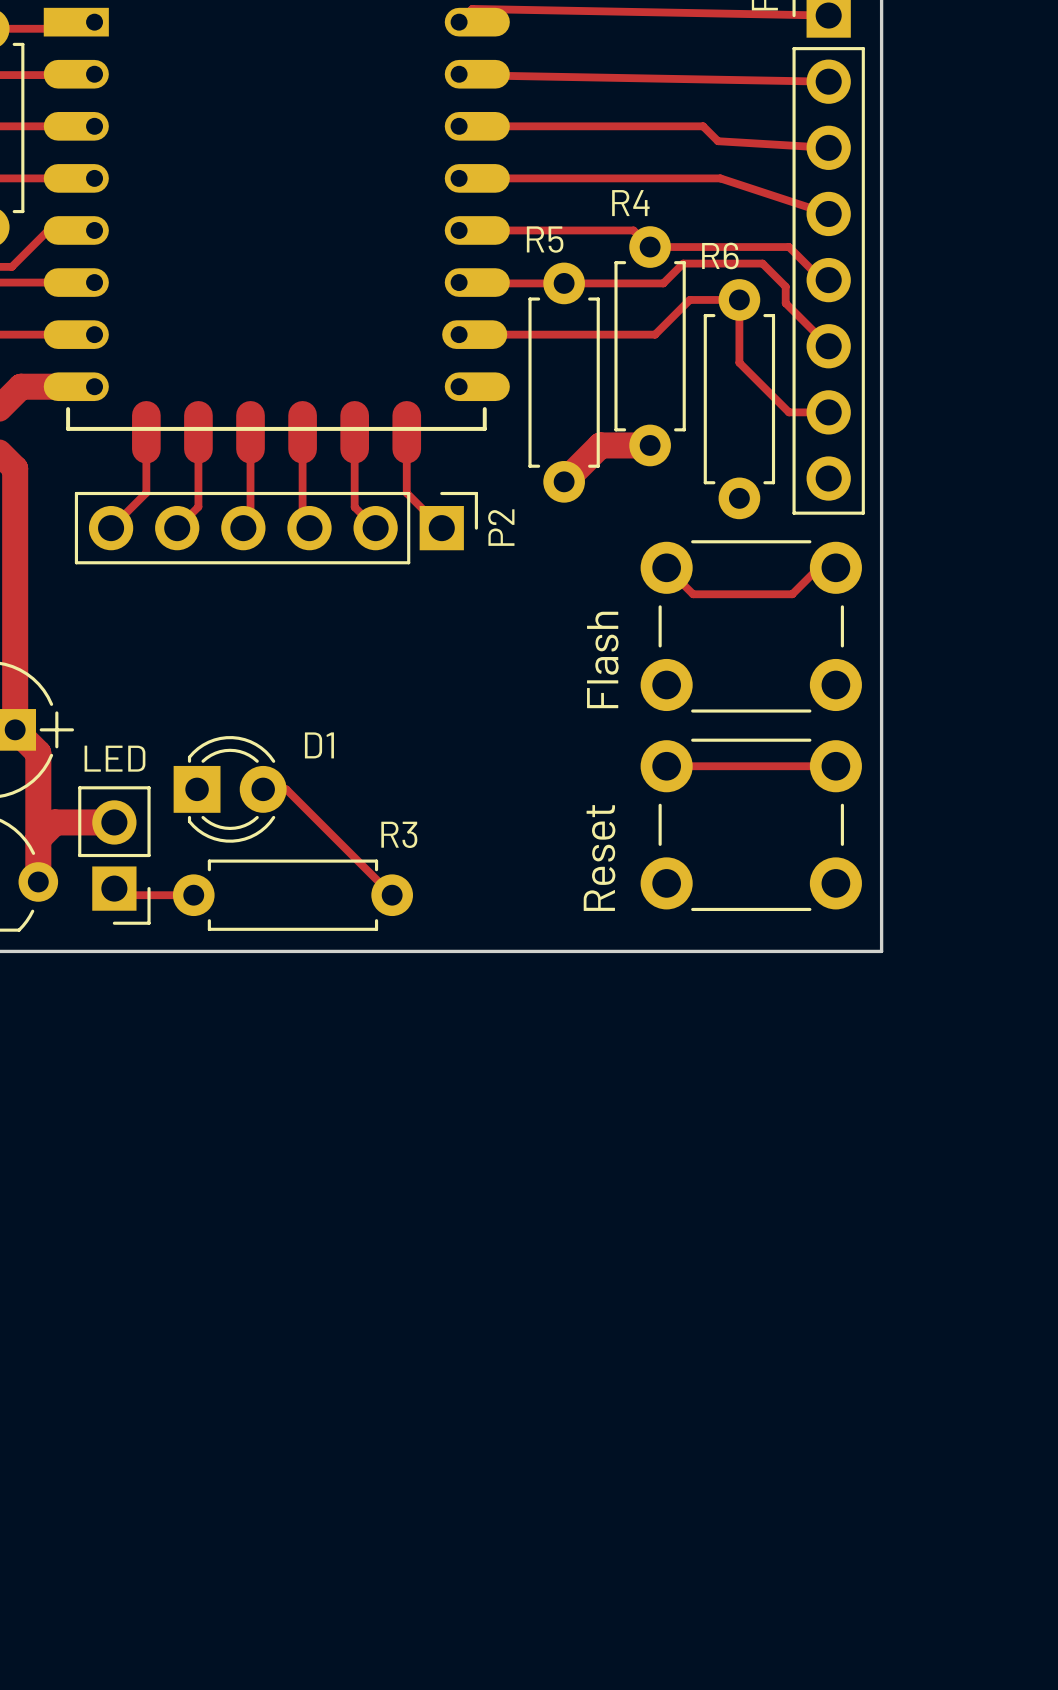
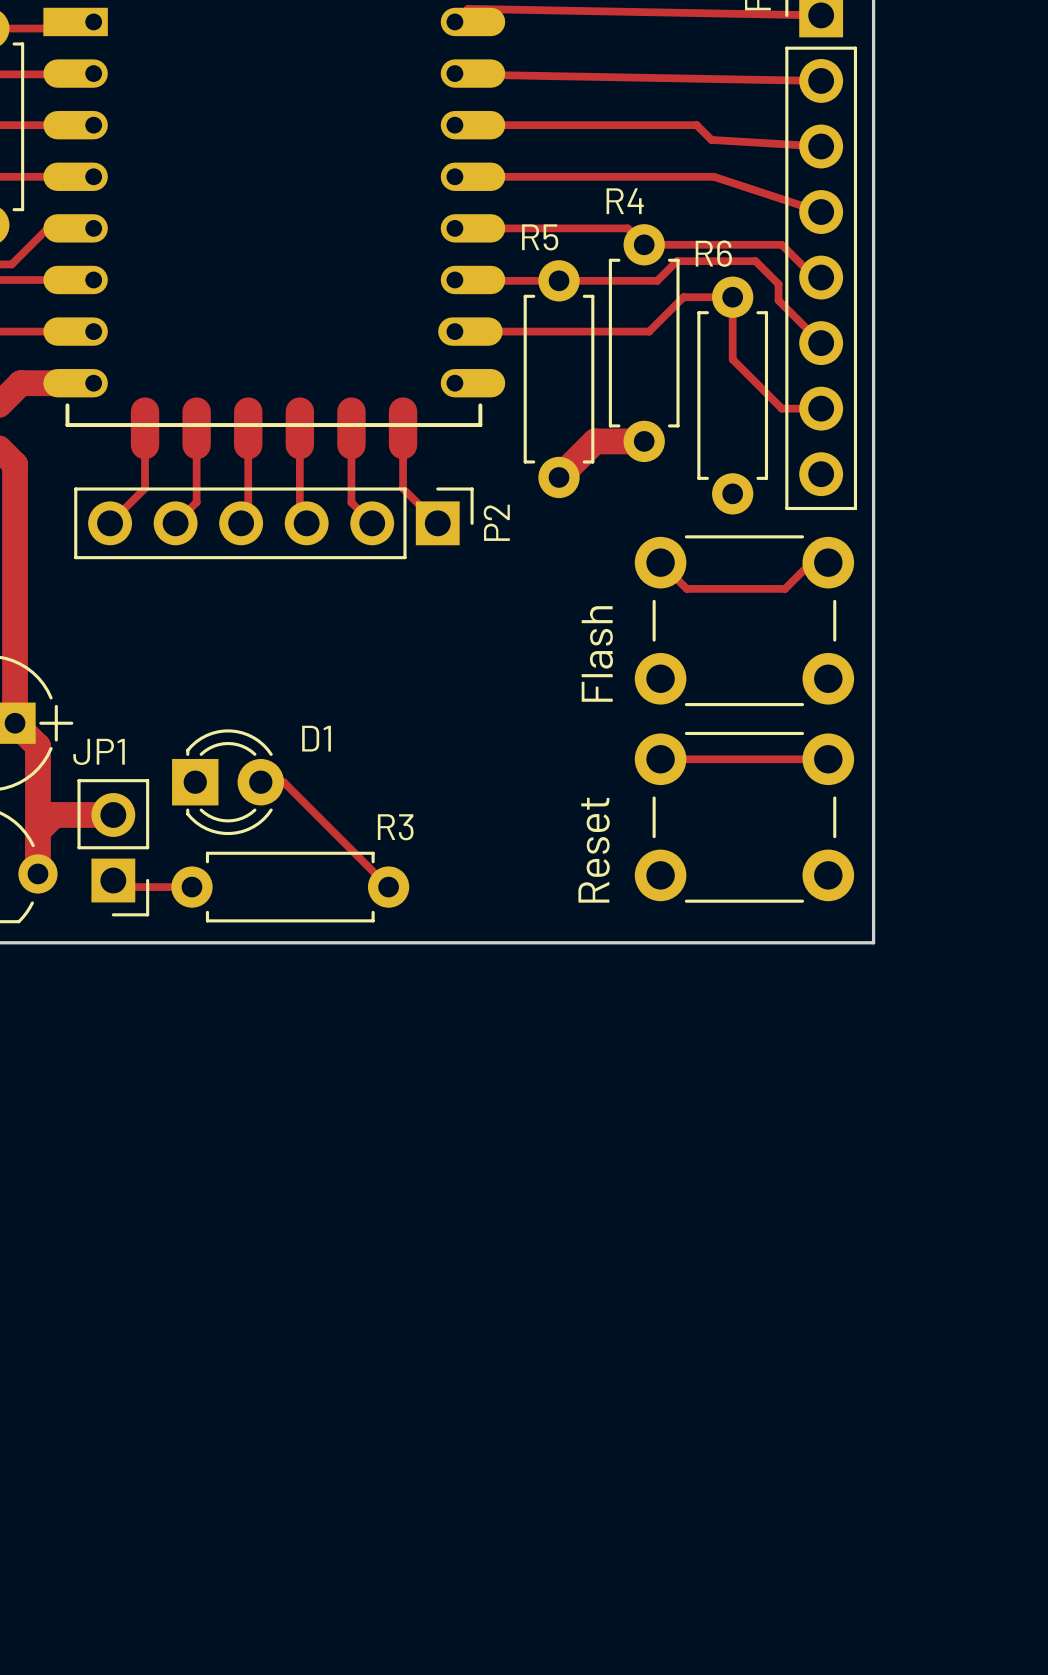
LED name: LED (114, 758) -> JP1 (99, 751)

